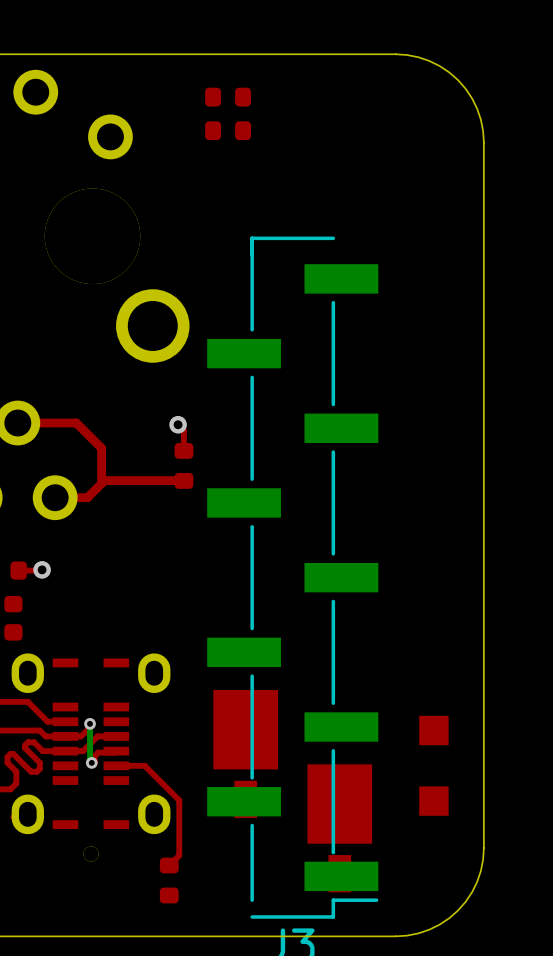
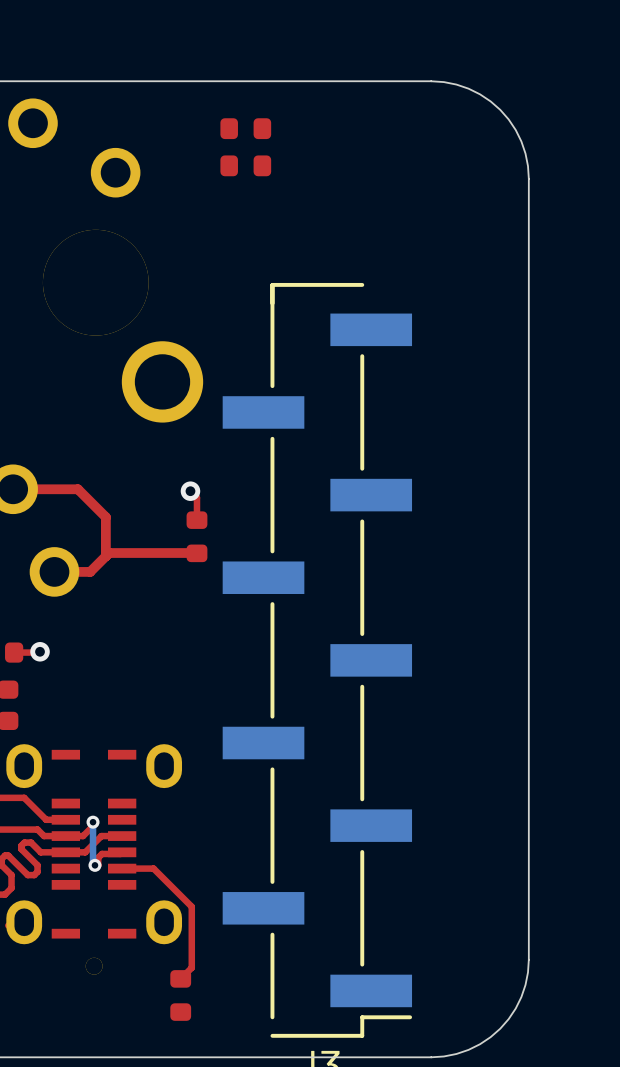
part: (433, 730) -> none
part: (245, 754) -> none
part: (433, 801) -> none
part: (339, 828) -> none

